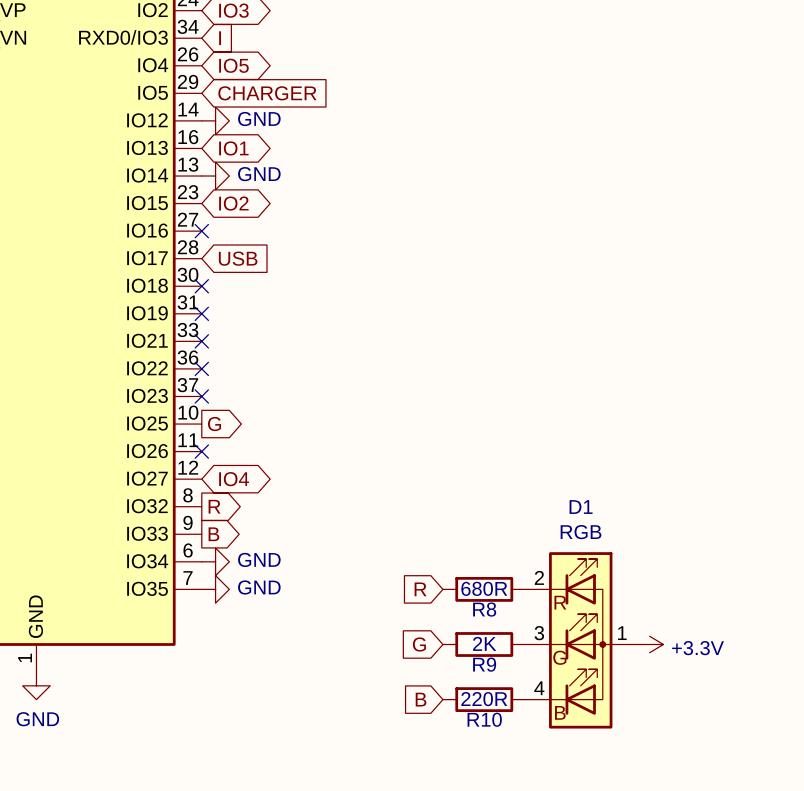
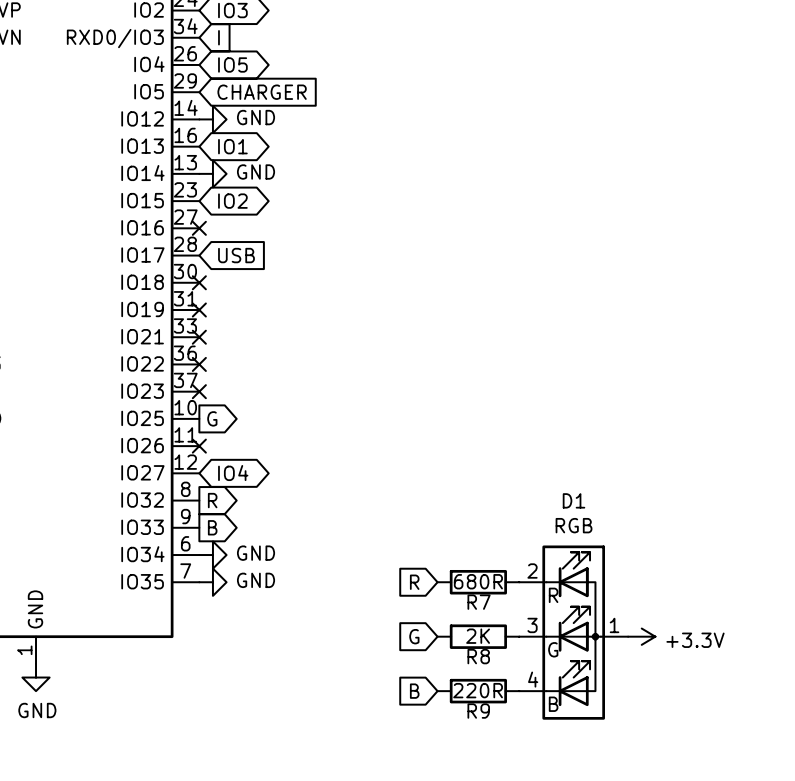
R8 name: R8 (484, 609) -> R7 (479, 602)
R9 name: R9 (484, 664) -> R8 (478, 656)
R10 name: R10 (484, 719) -> R9 (478, 711)

